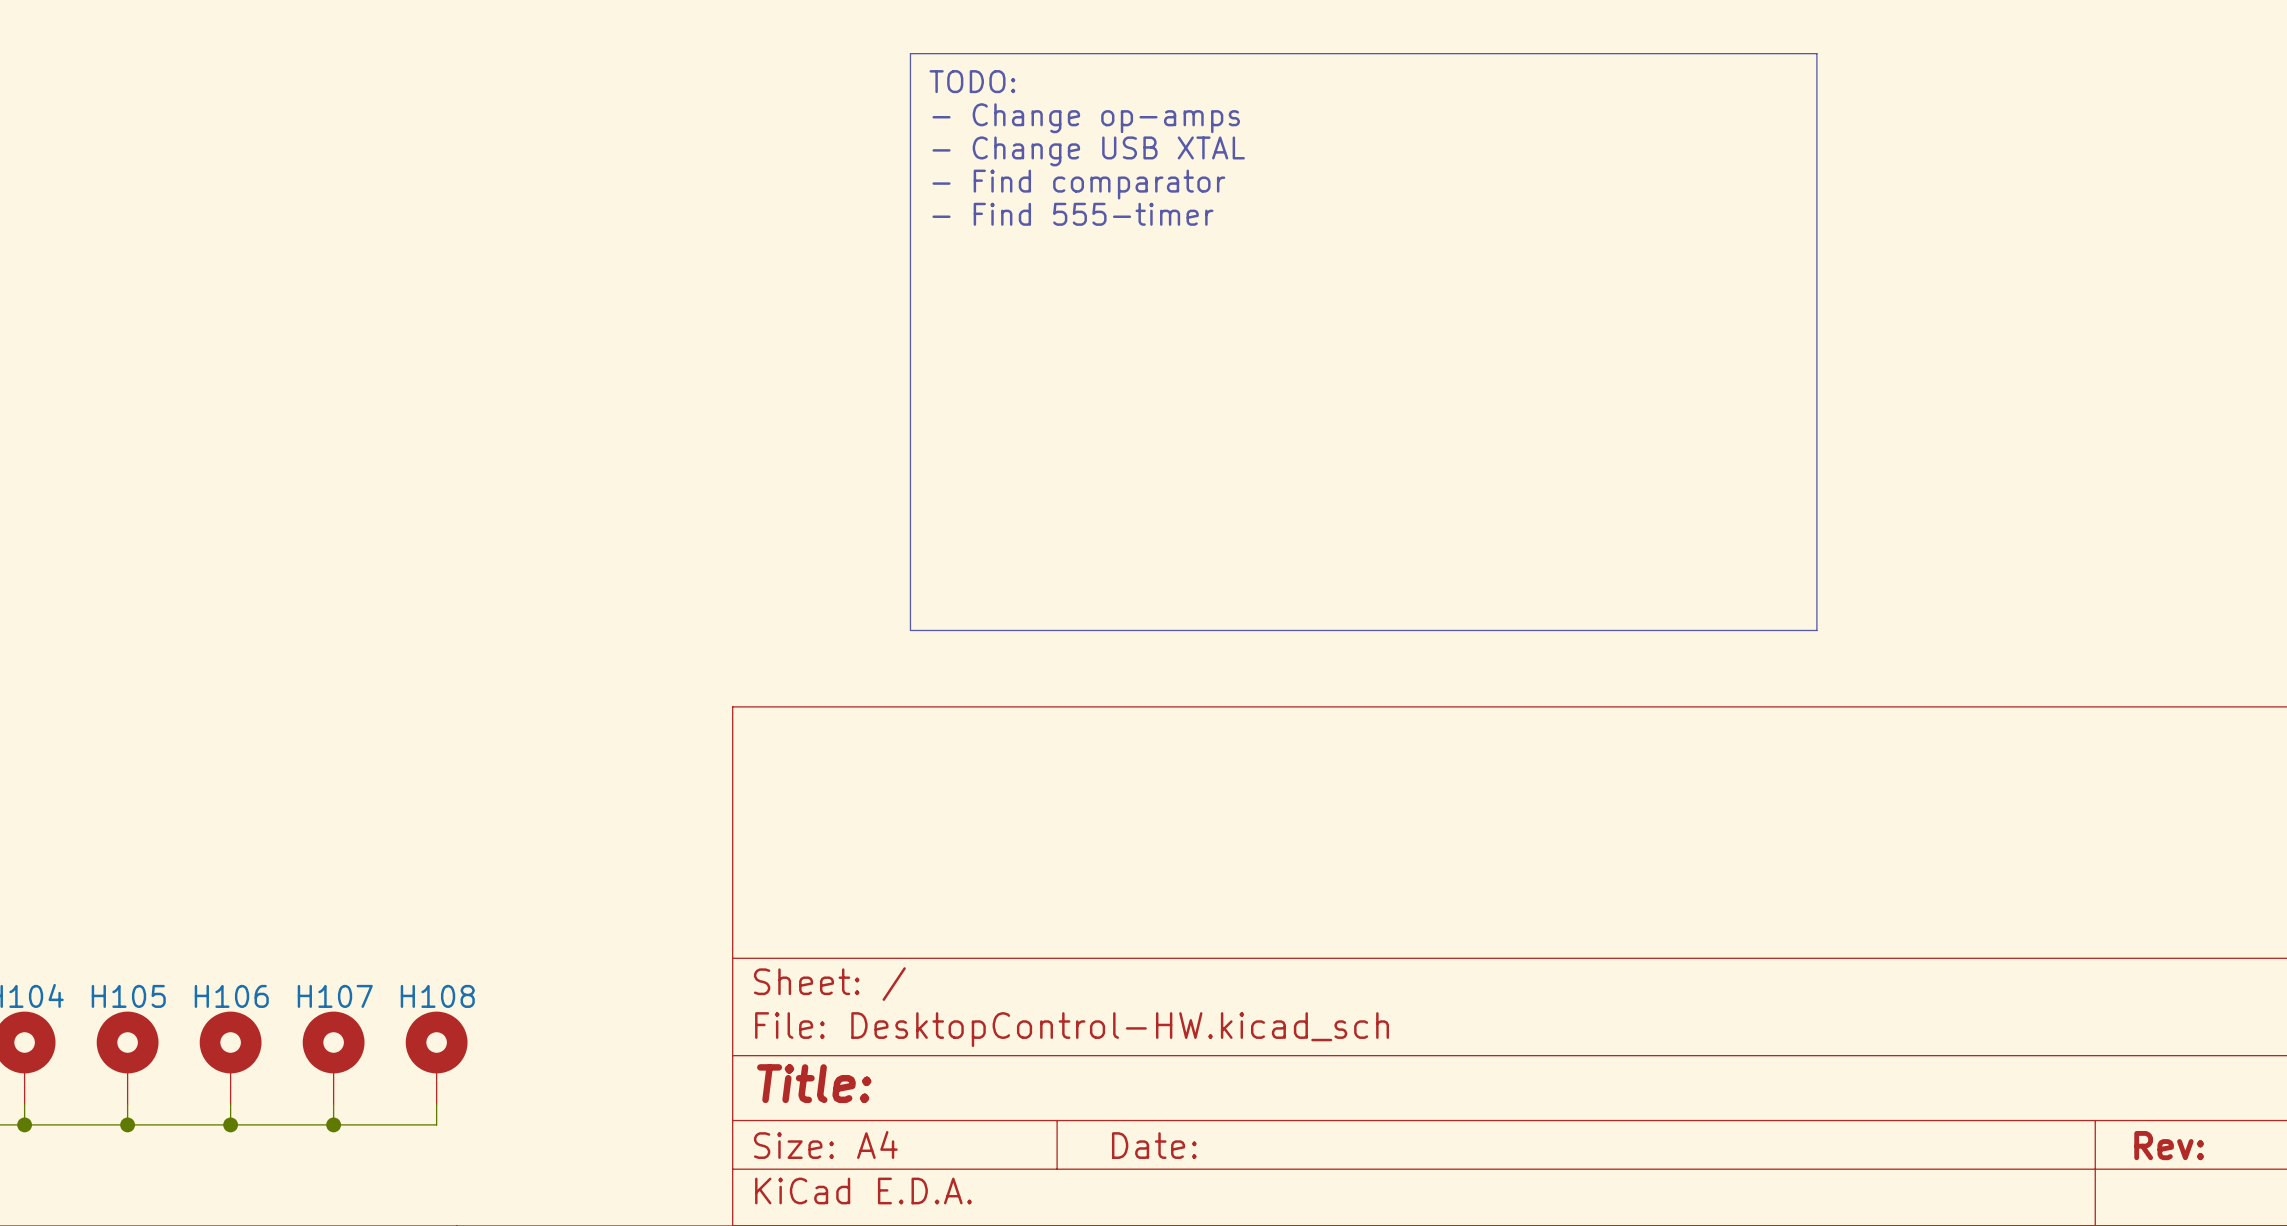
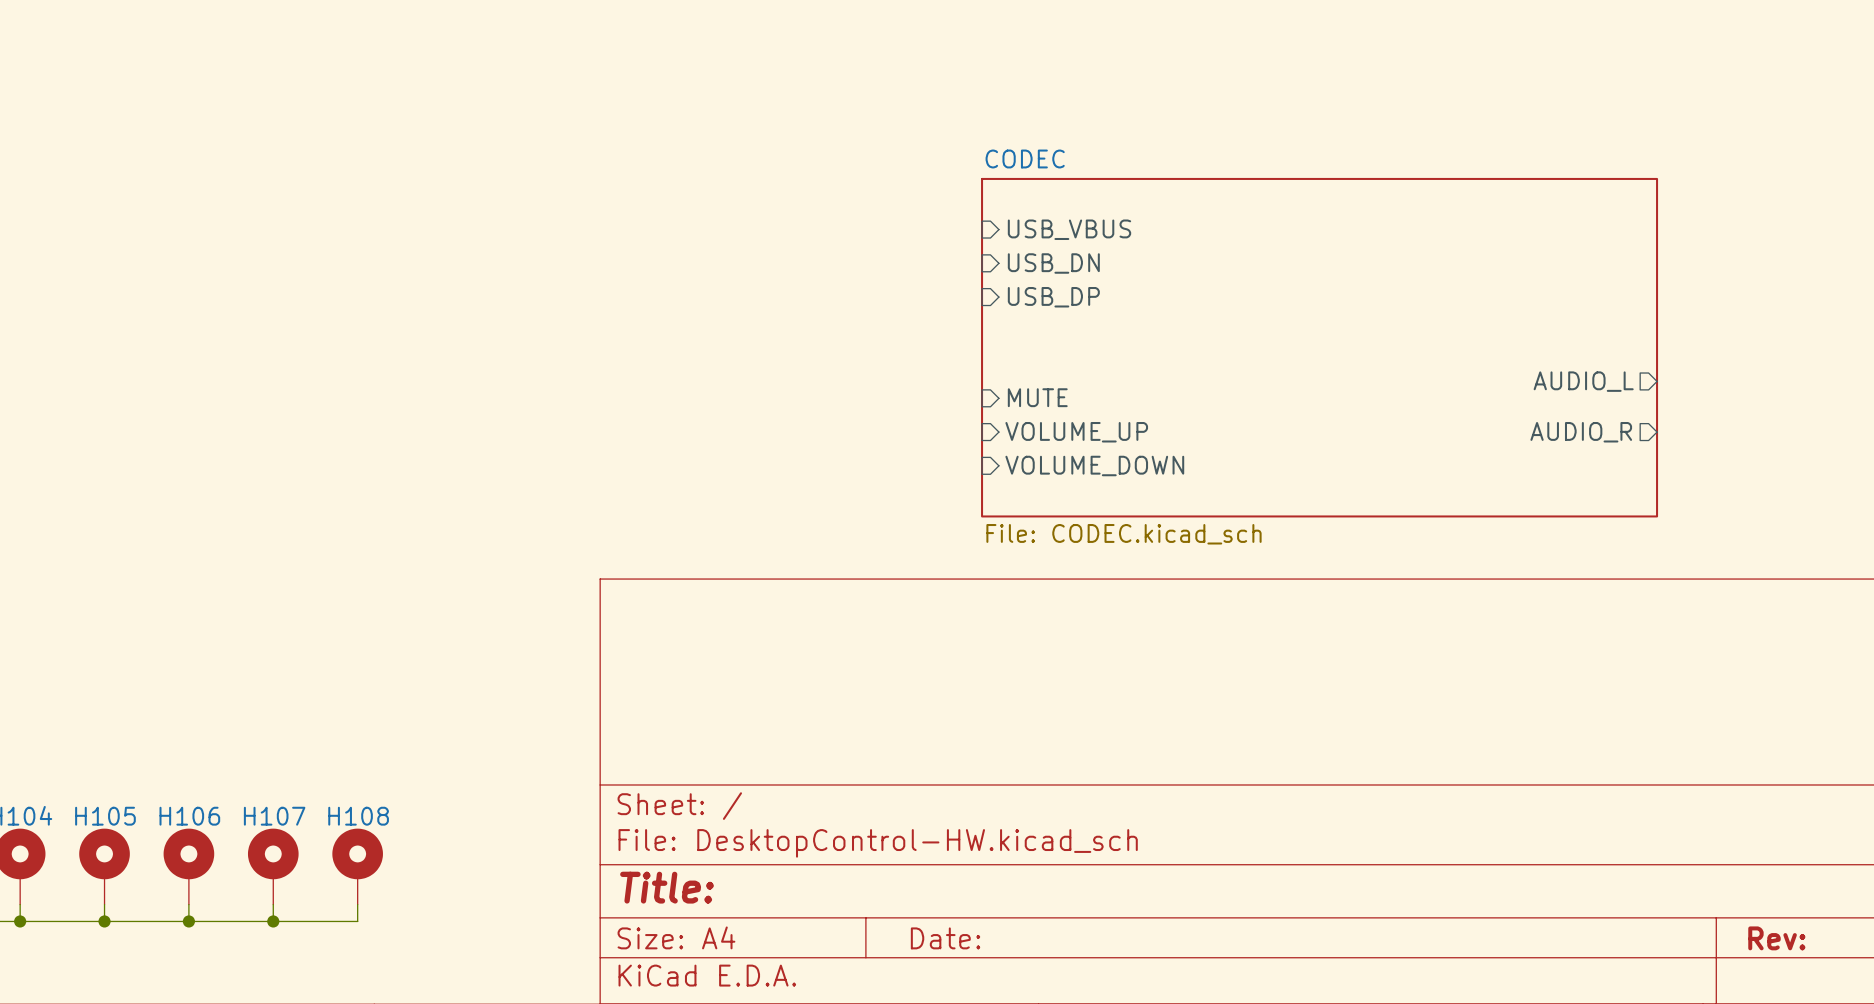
line: (910, 53) (1816, 53) (1816, 630) (910, 630) (910, 53) -> none
text: TODO: (972, 81) -> none
text: - Change op-amps (1086, 118) -> none
text: - Change USB XTAL (1088, 151) -> none
text: - Find comparator (1078, 184) -> none
text: - Find 555-timer (1072, 214) -> none
sheet pin: none -> USB_VBUS (1069, 229)
sheet pin: none -> USB_DN (1053, 263)
sheet pin: none -> USB_DP (1053, 297)
sheet CODEC: none -> File: CODEC.kicad_sch (1319, 347)
sheet pin: none -> AUDIO_L (1583, 381)
sheet pin: none -> MUTE (1037, 397)
sheet pin: none -> VOLUME_UP (1076, 432)
sheet pin: none -> AUDIO_R (1581, 432)
sheet pin: none -> VOLUME_DOWN (1094, 466)

